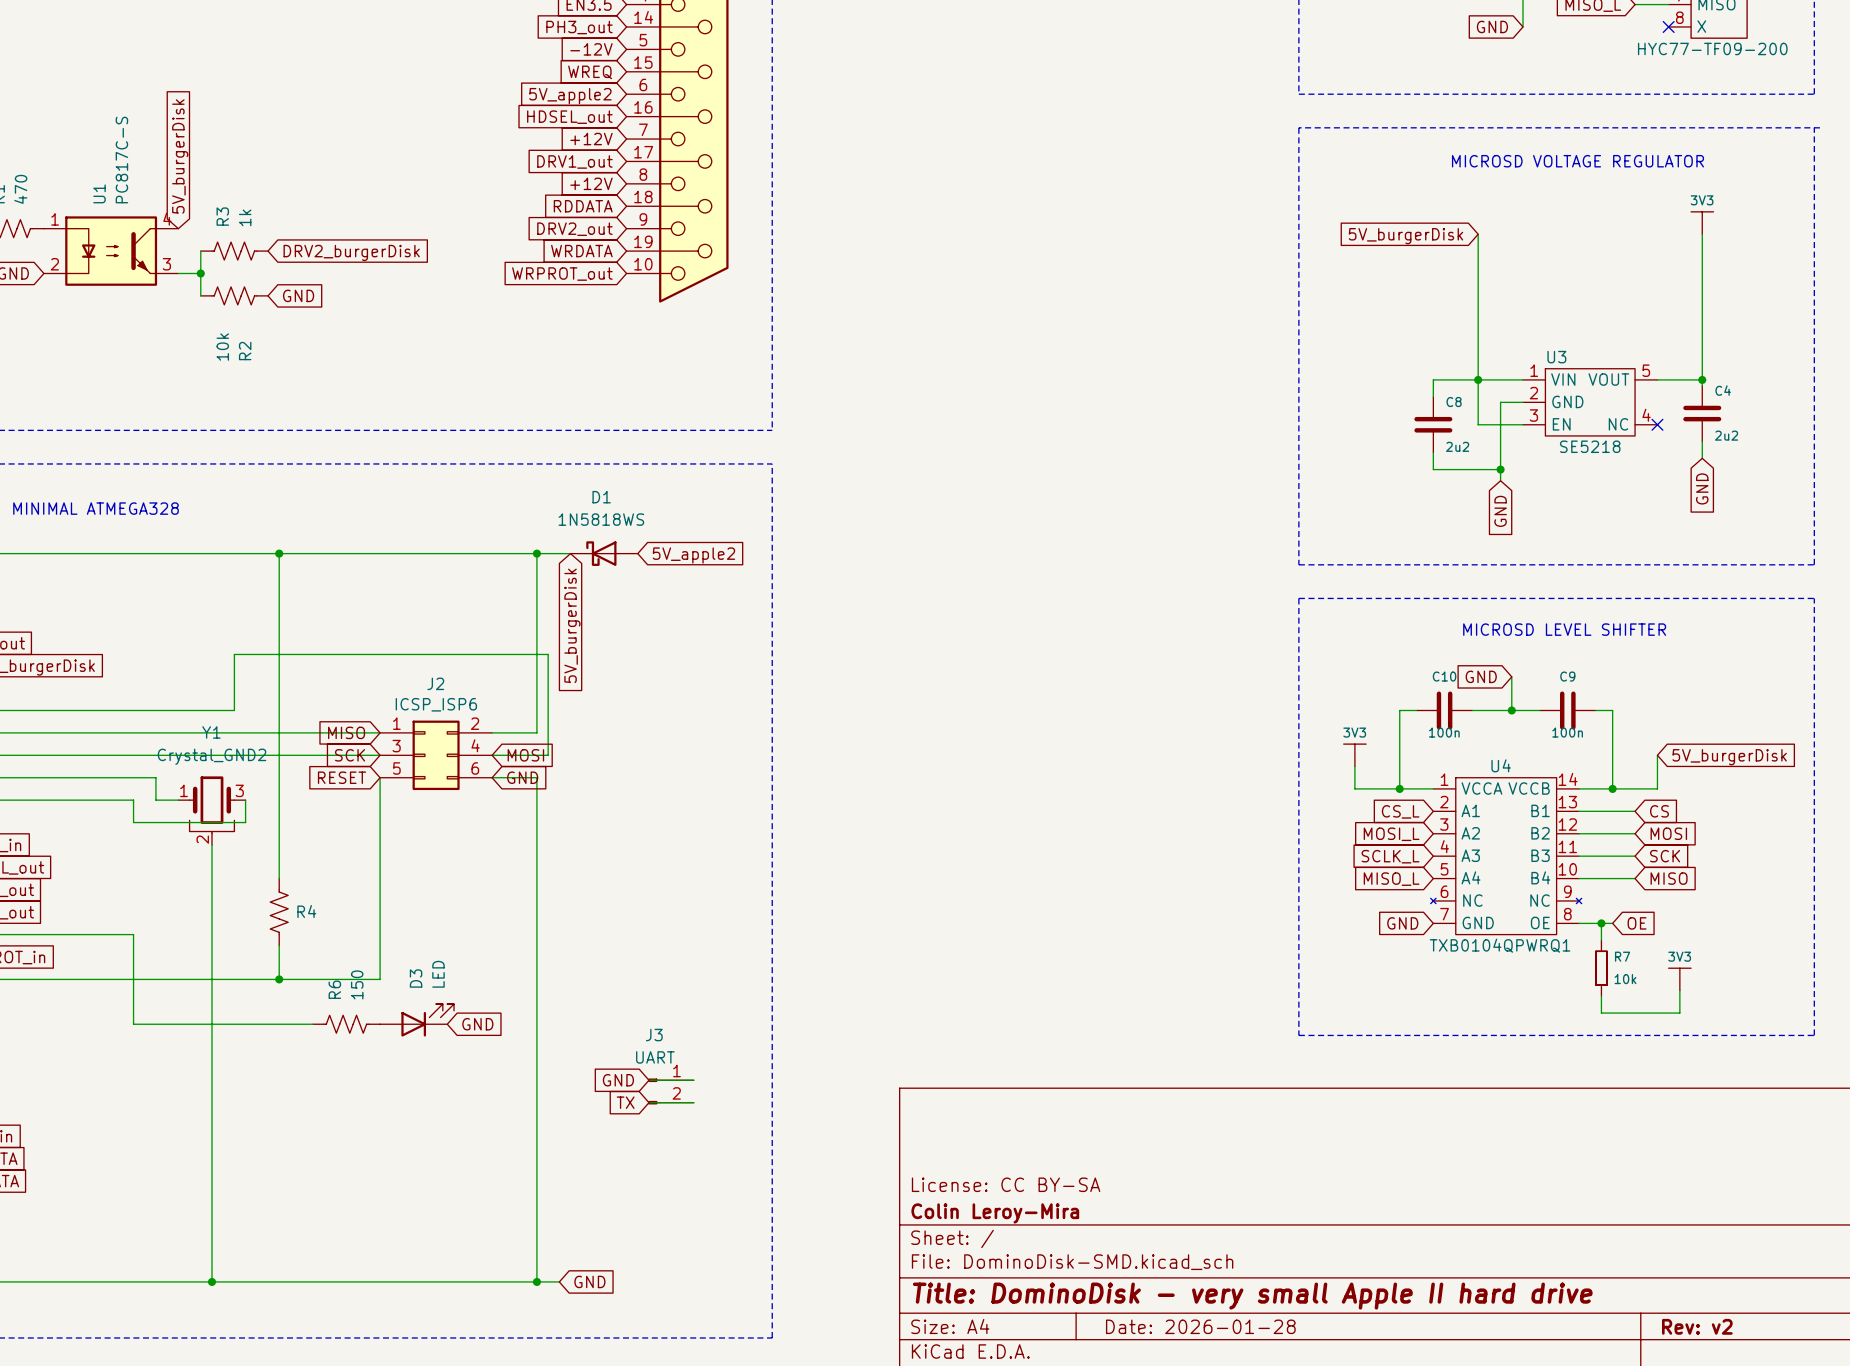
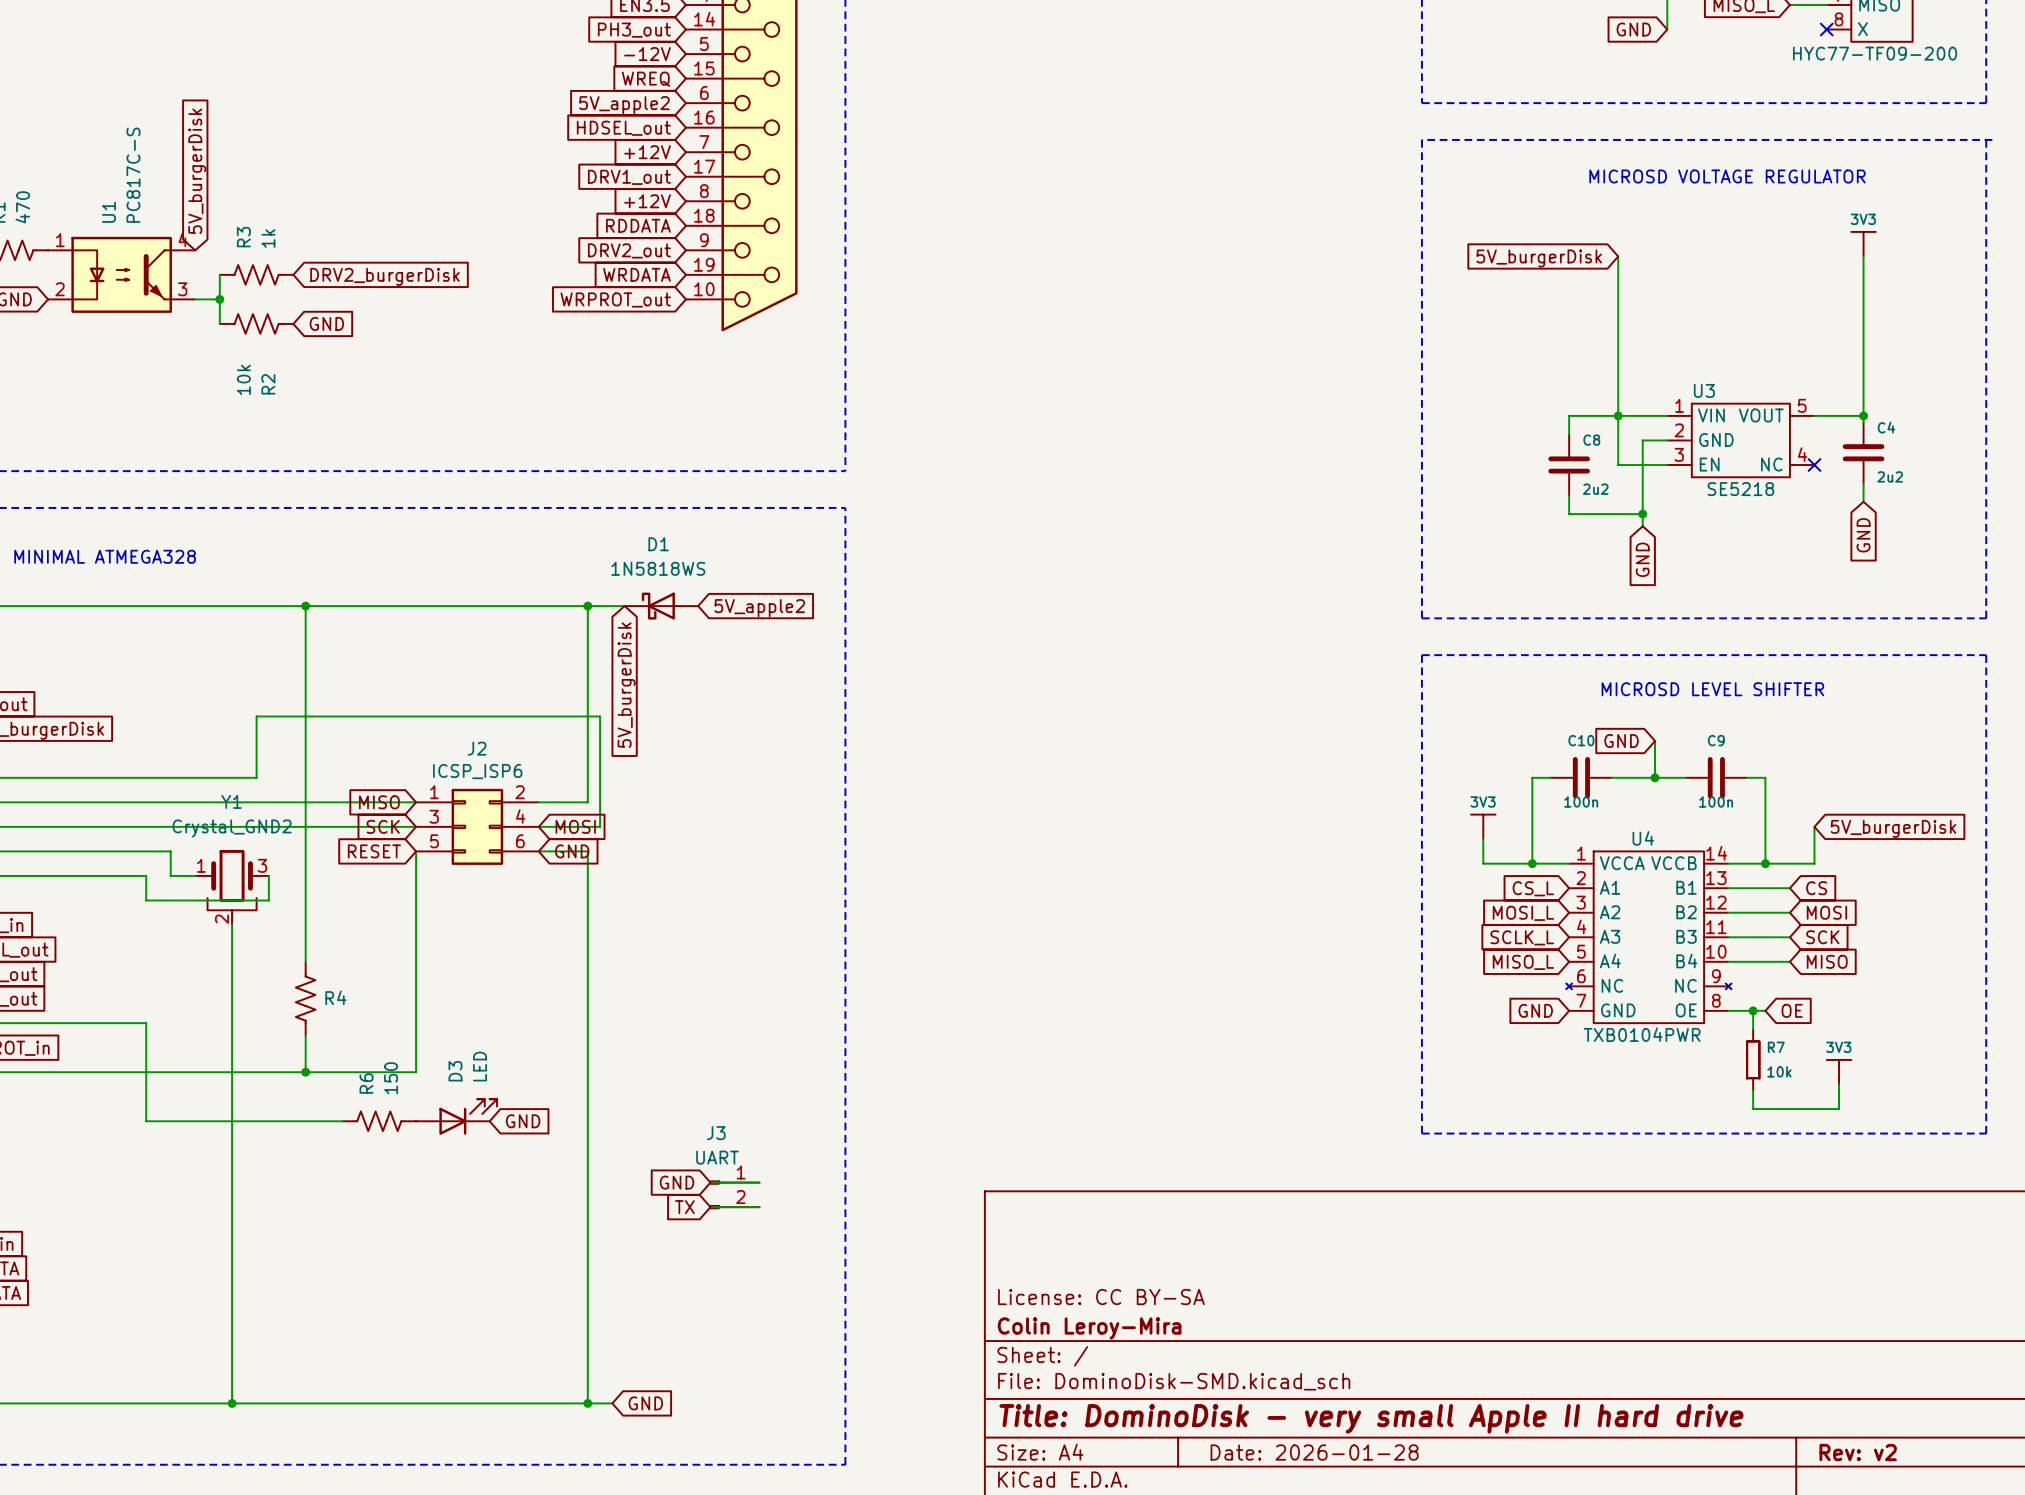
U4 value: TXB0104QPWRQ1 (1500, 945) -> TXB0104PWR (1642, 1034)

